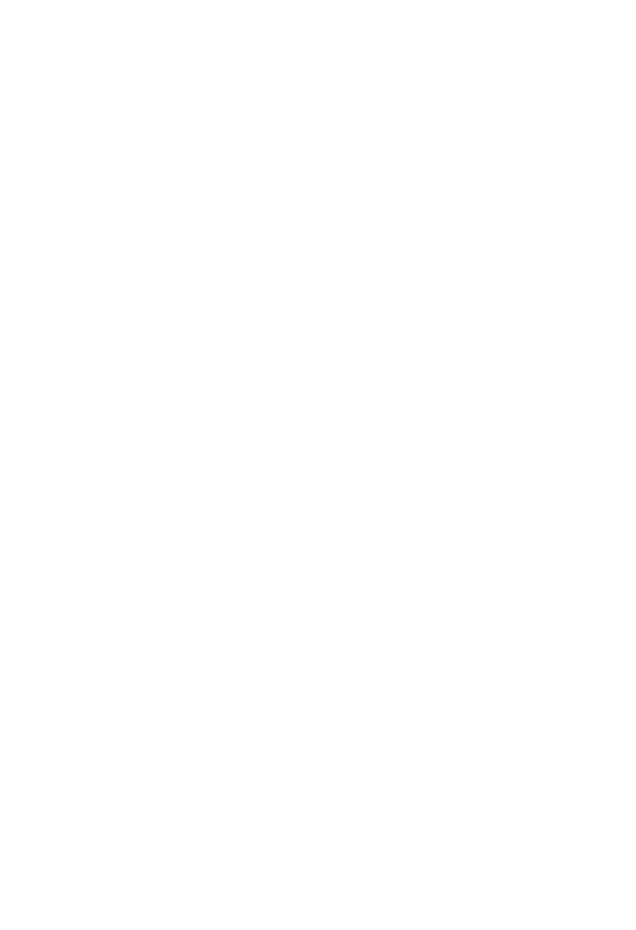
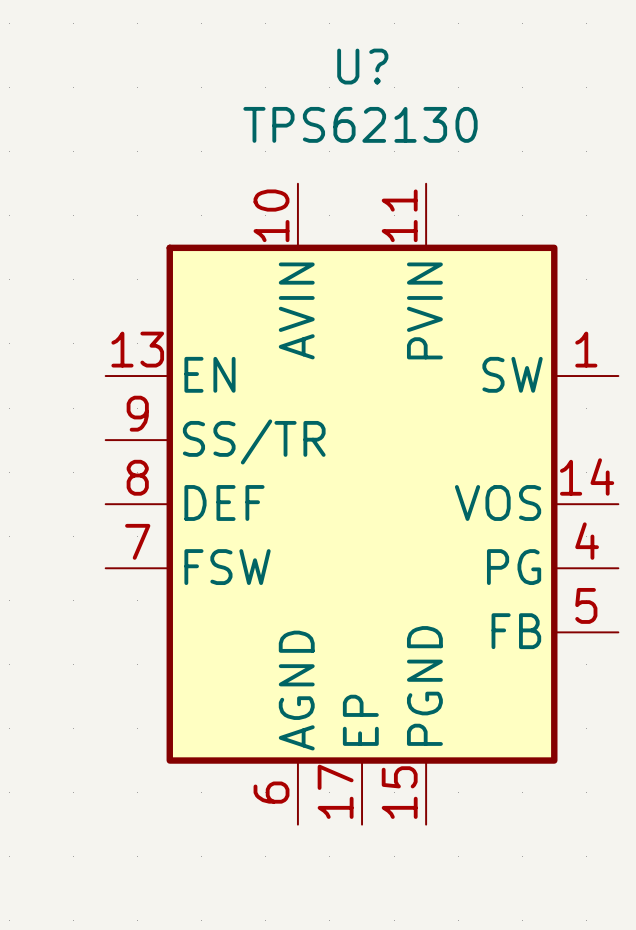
U?: none -> TPS62130 (362, 504)

